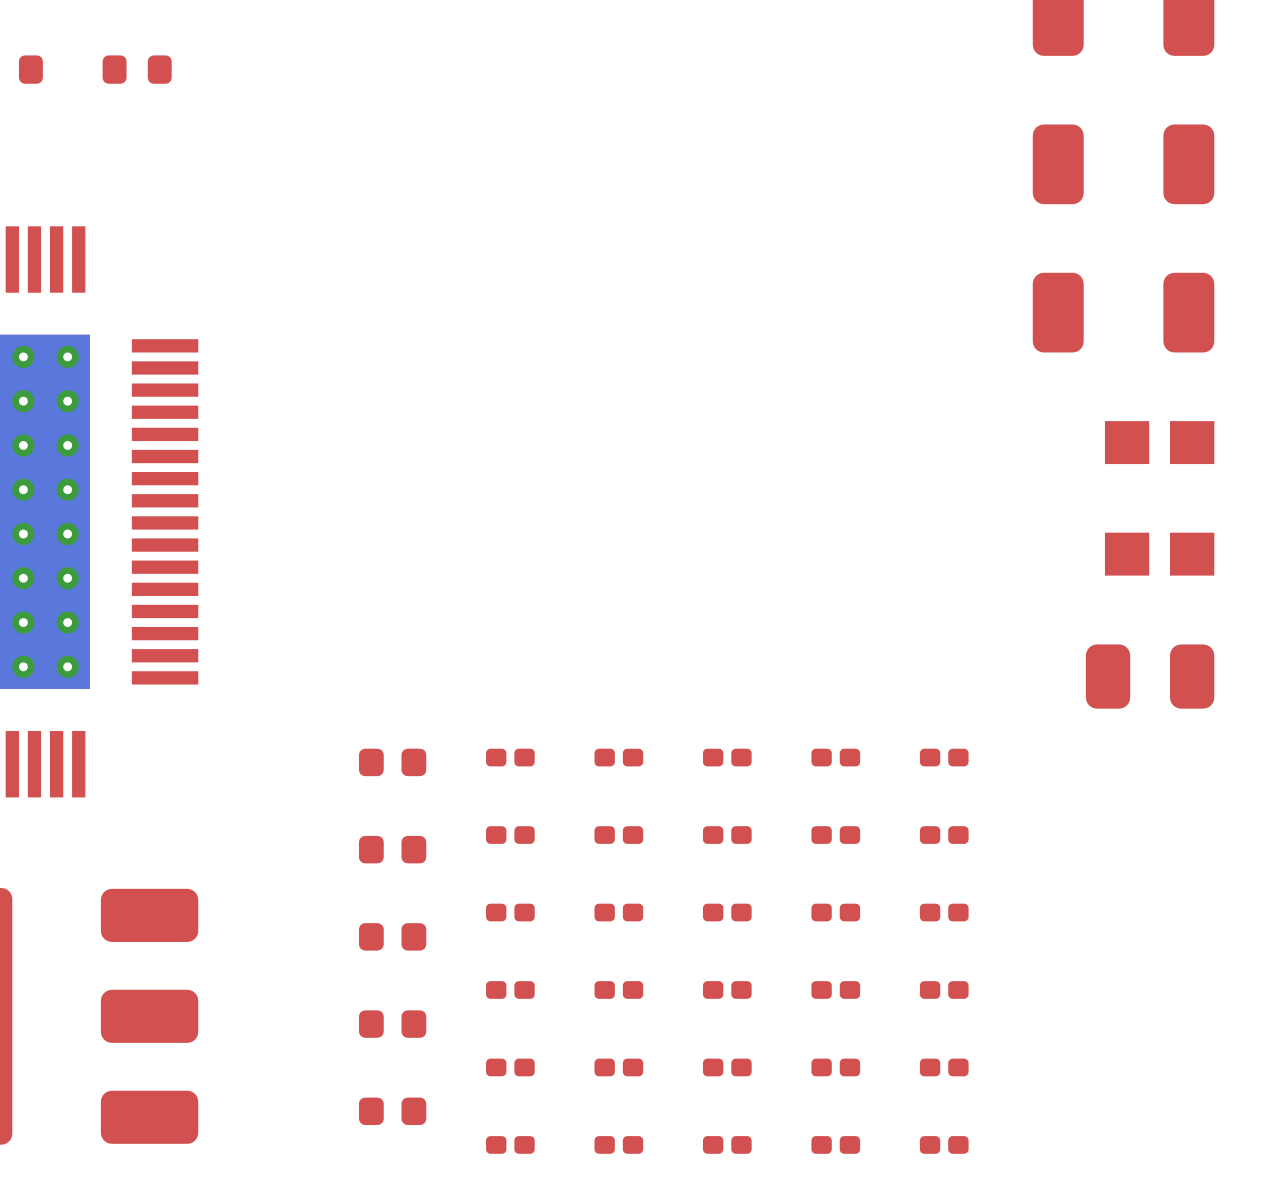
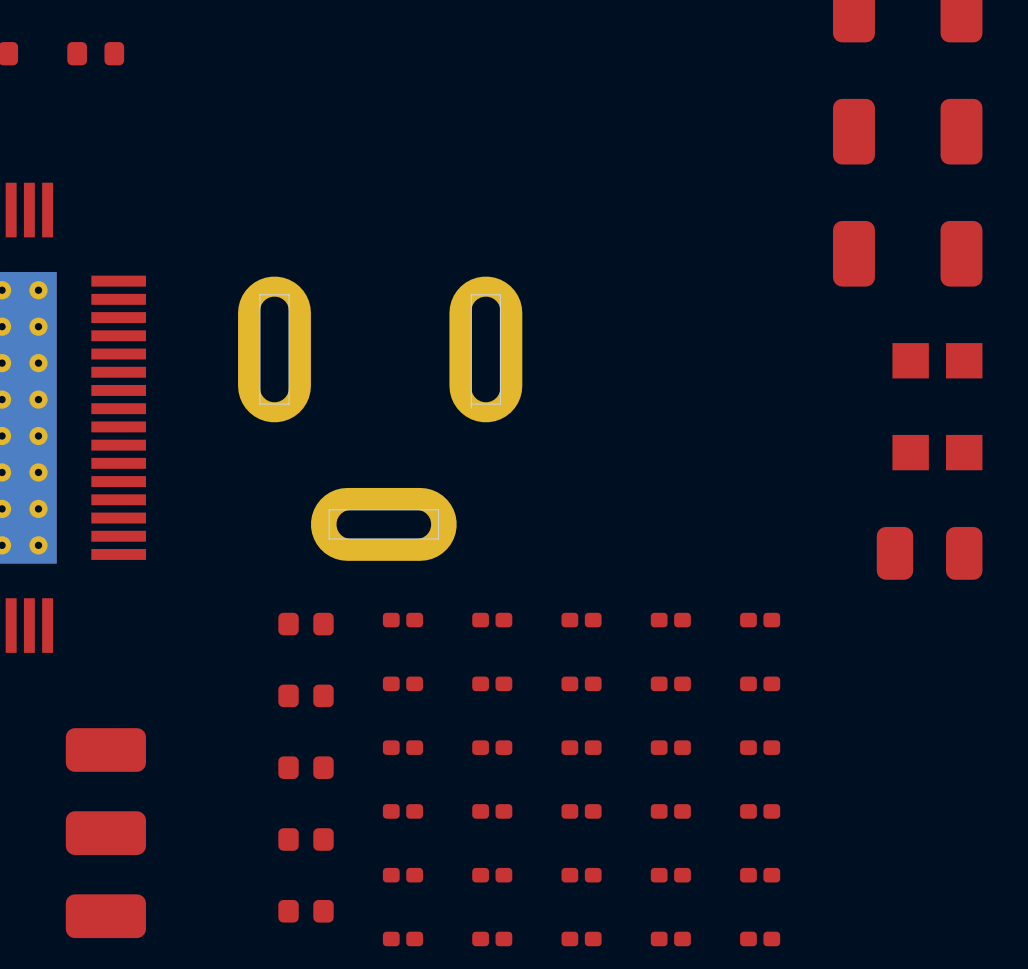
part: none -> (380, 418)

